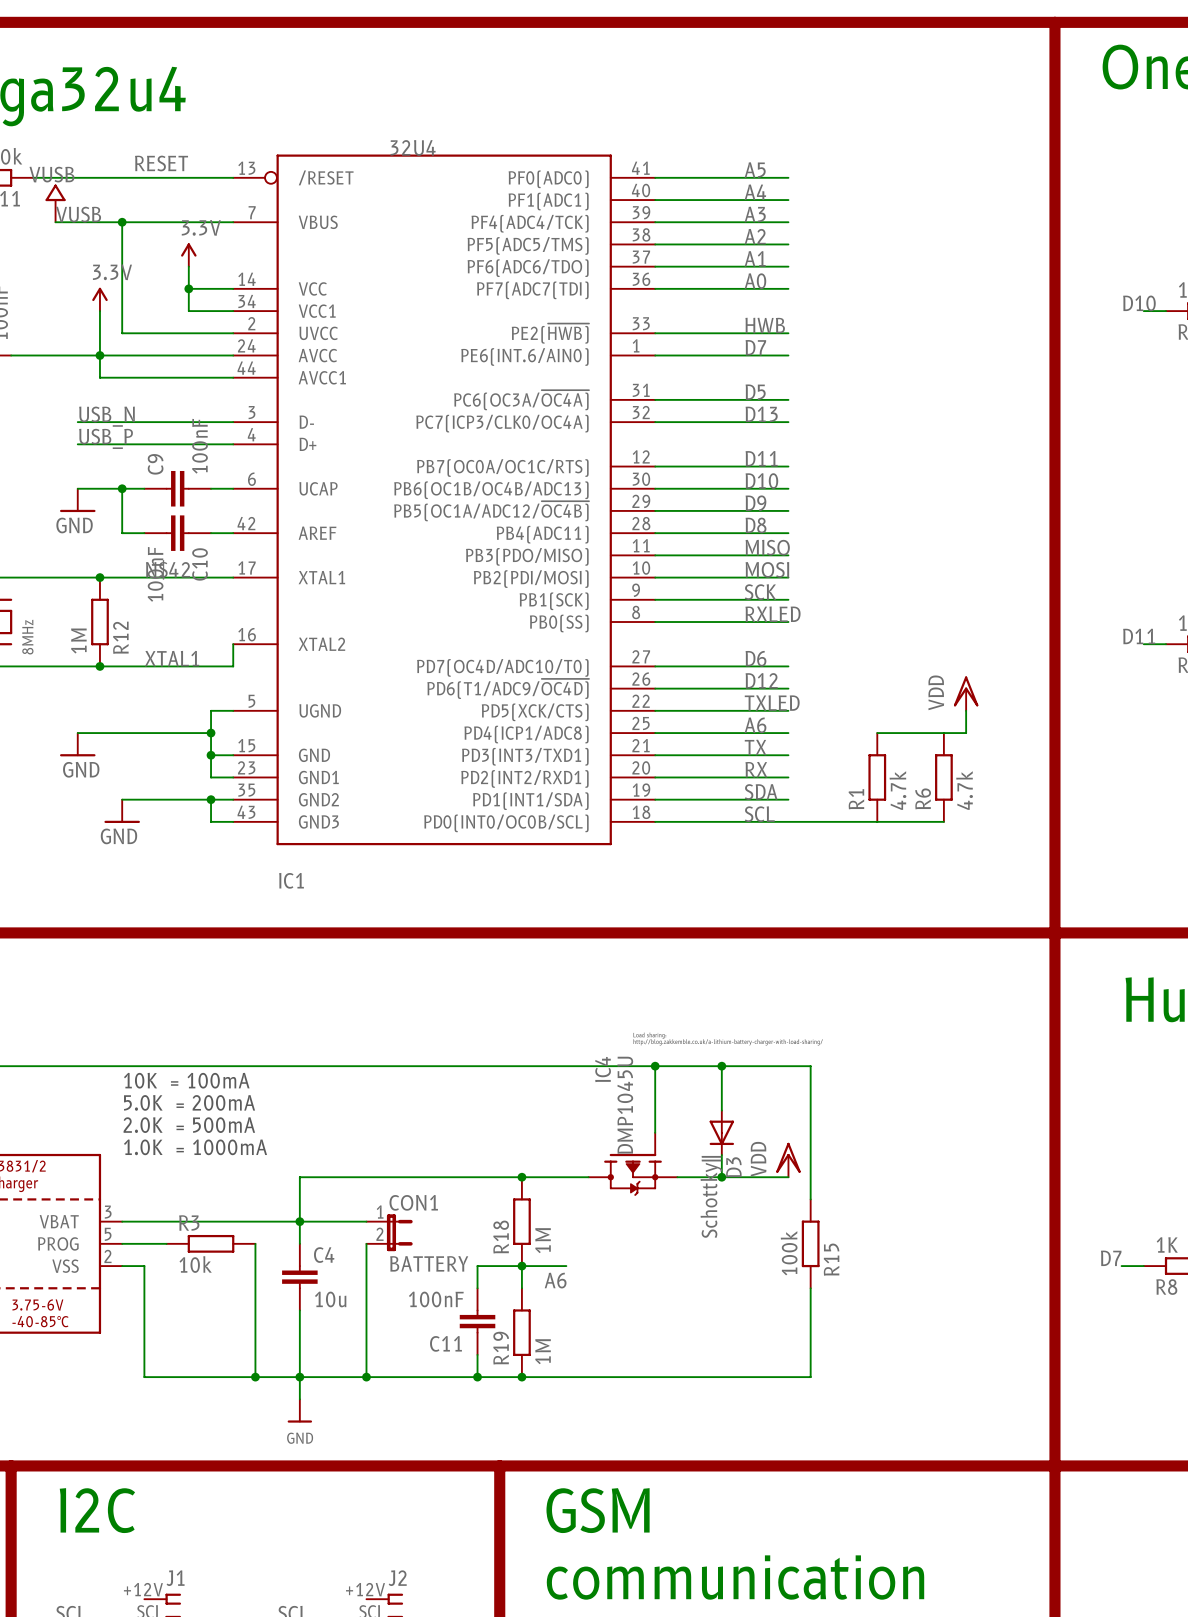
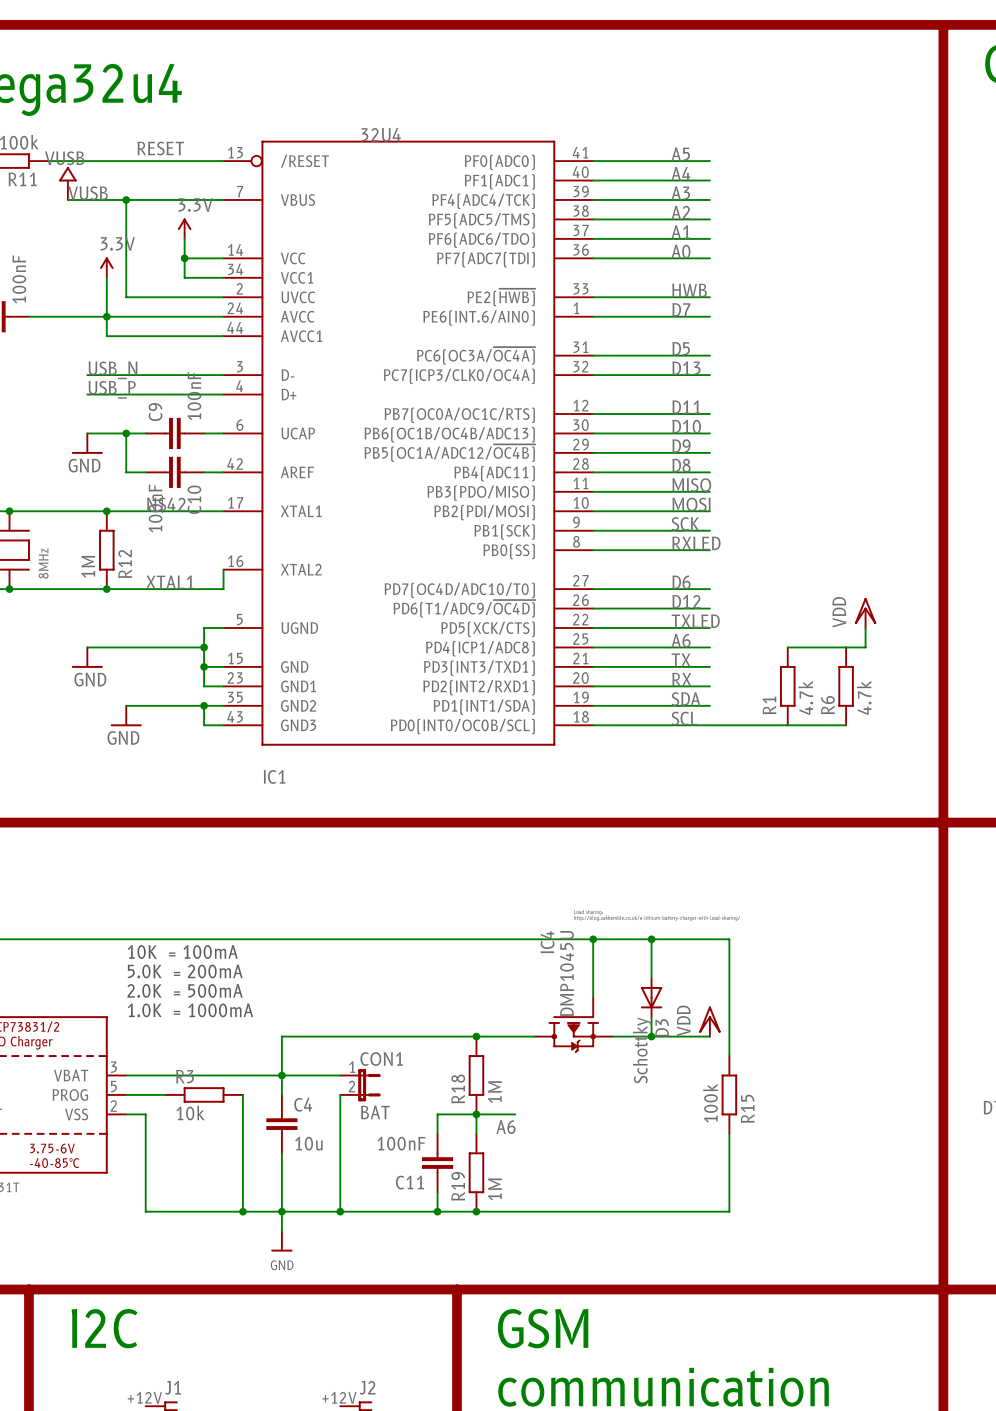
D3 value: Schottky|| (711, 1196) -> Schottky (642, 1050)
CON1 value: BATTERY (429, 1263) -> BAT (375, 1112)

